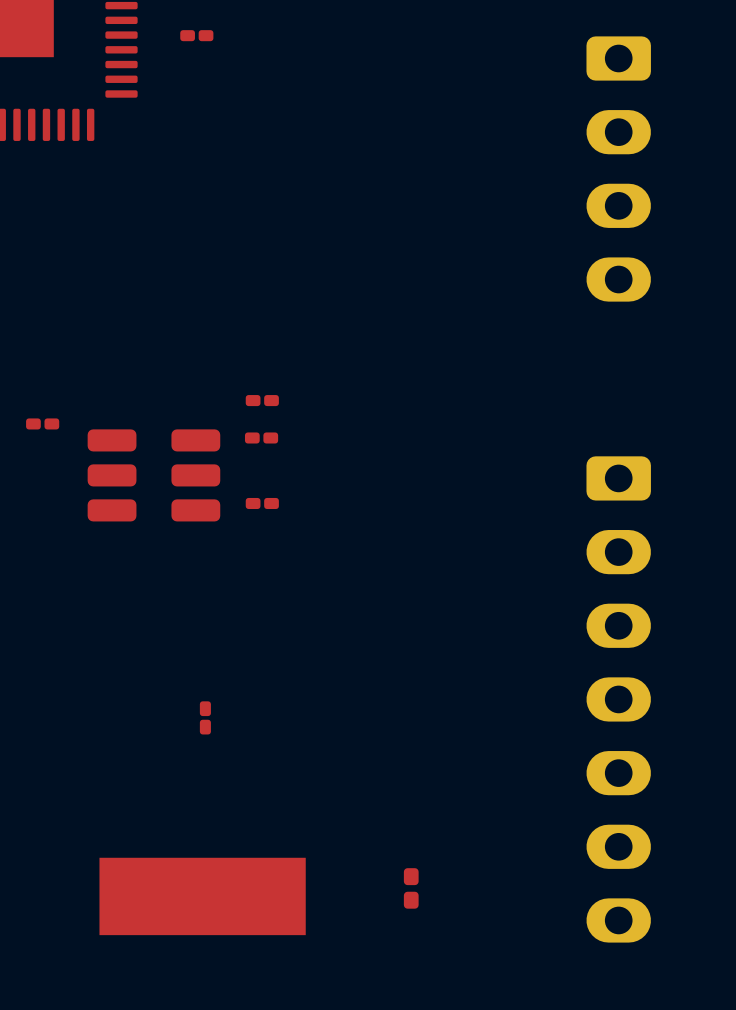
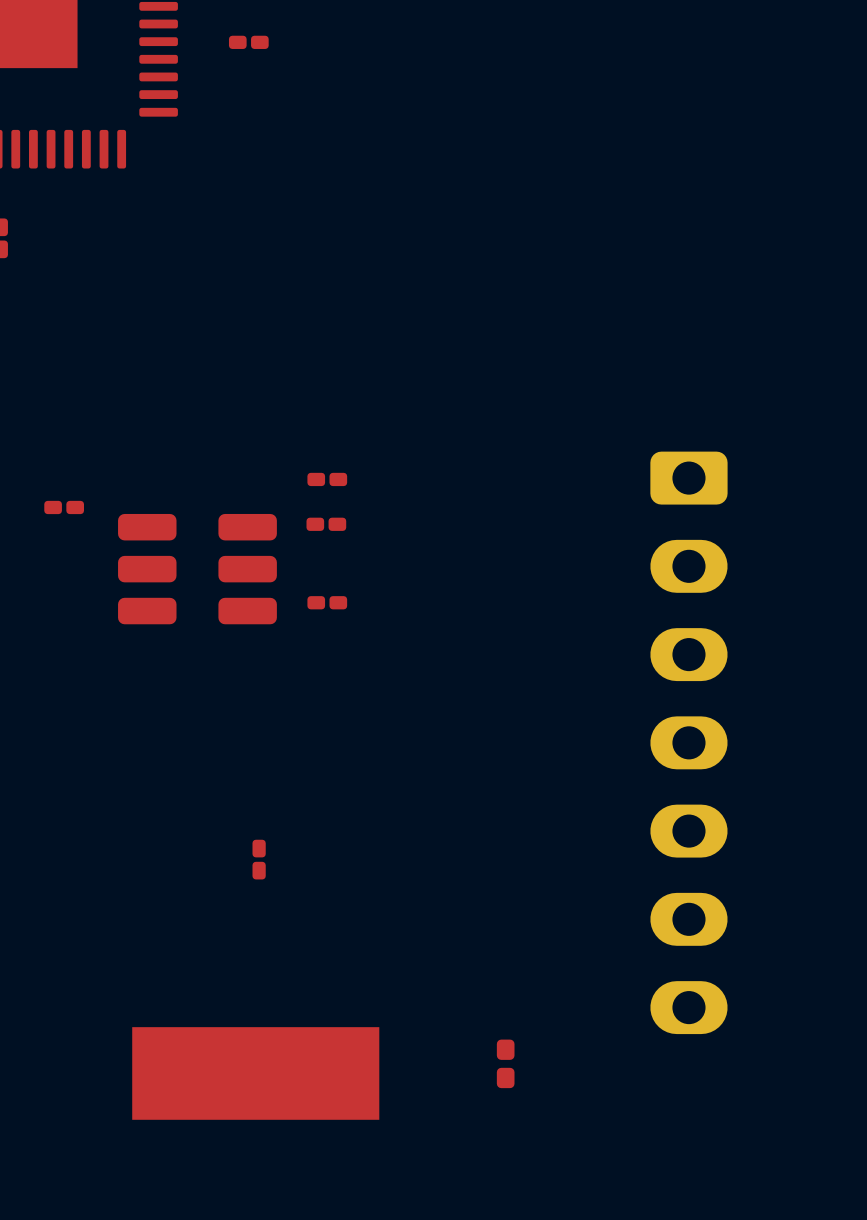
part: (618, 169) -> none
part position: (618, 699) -> (688, 742)

